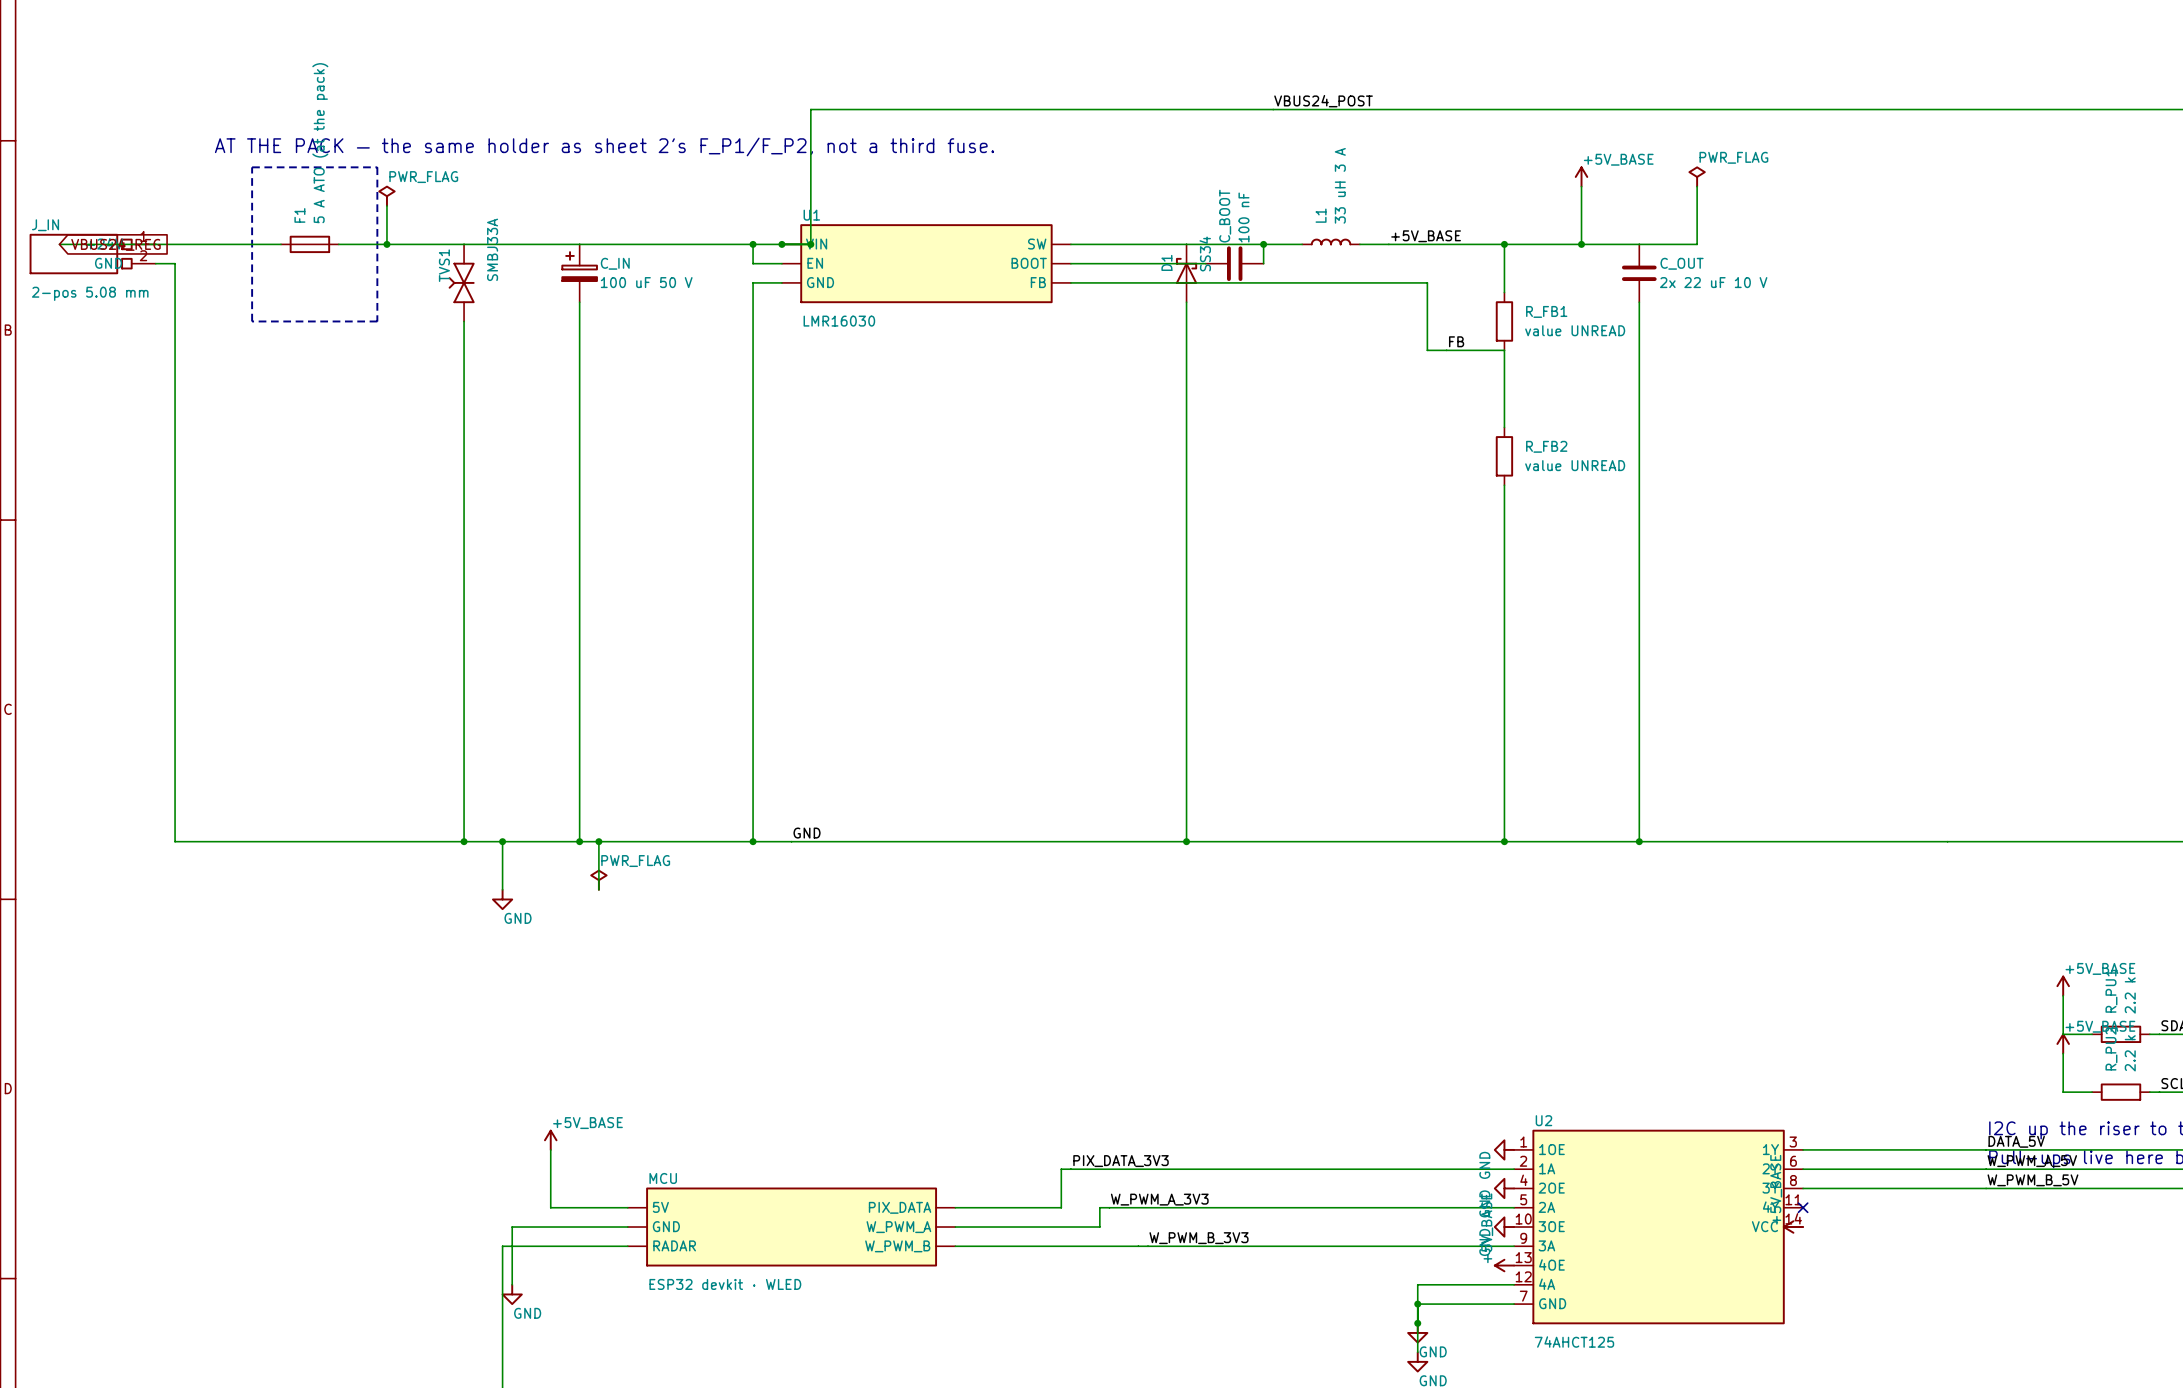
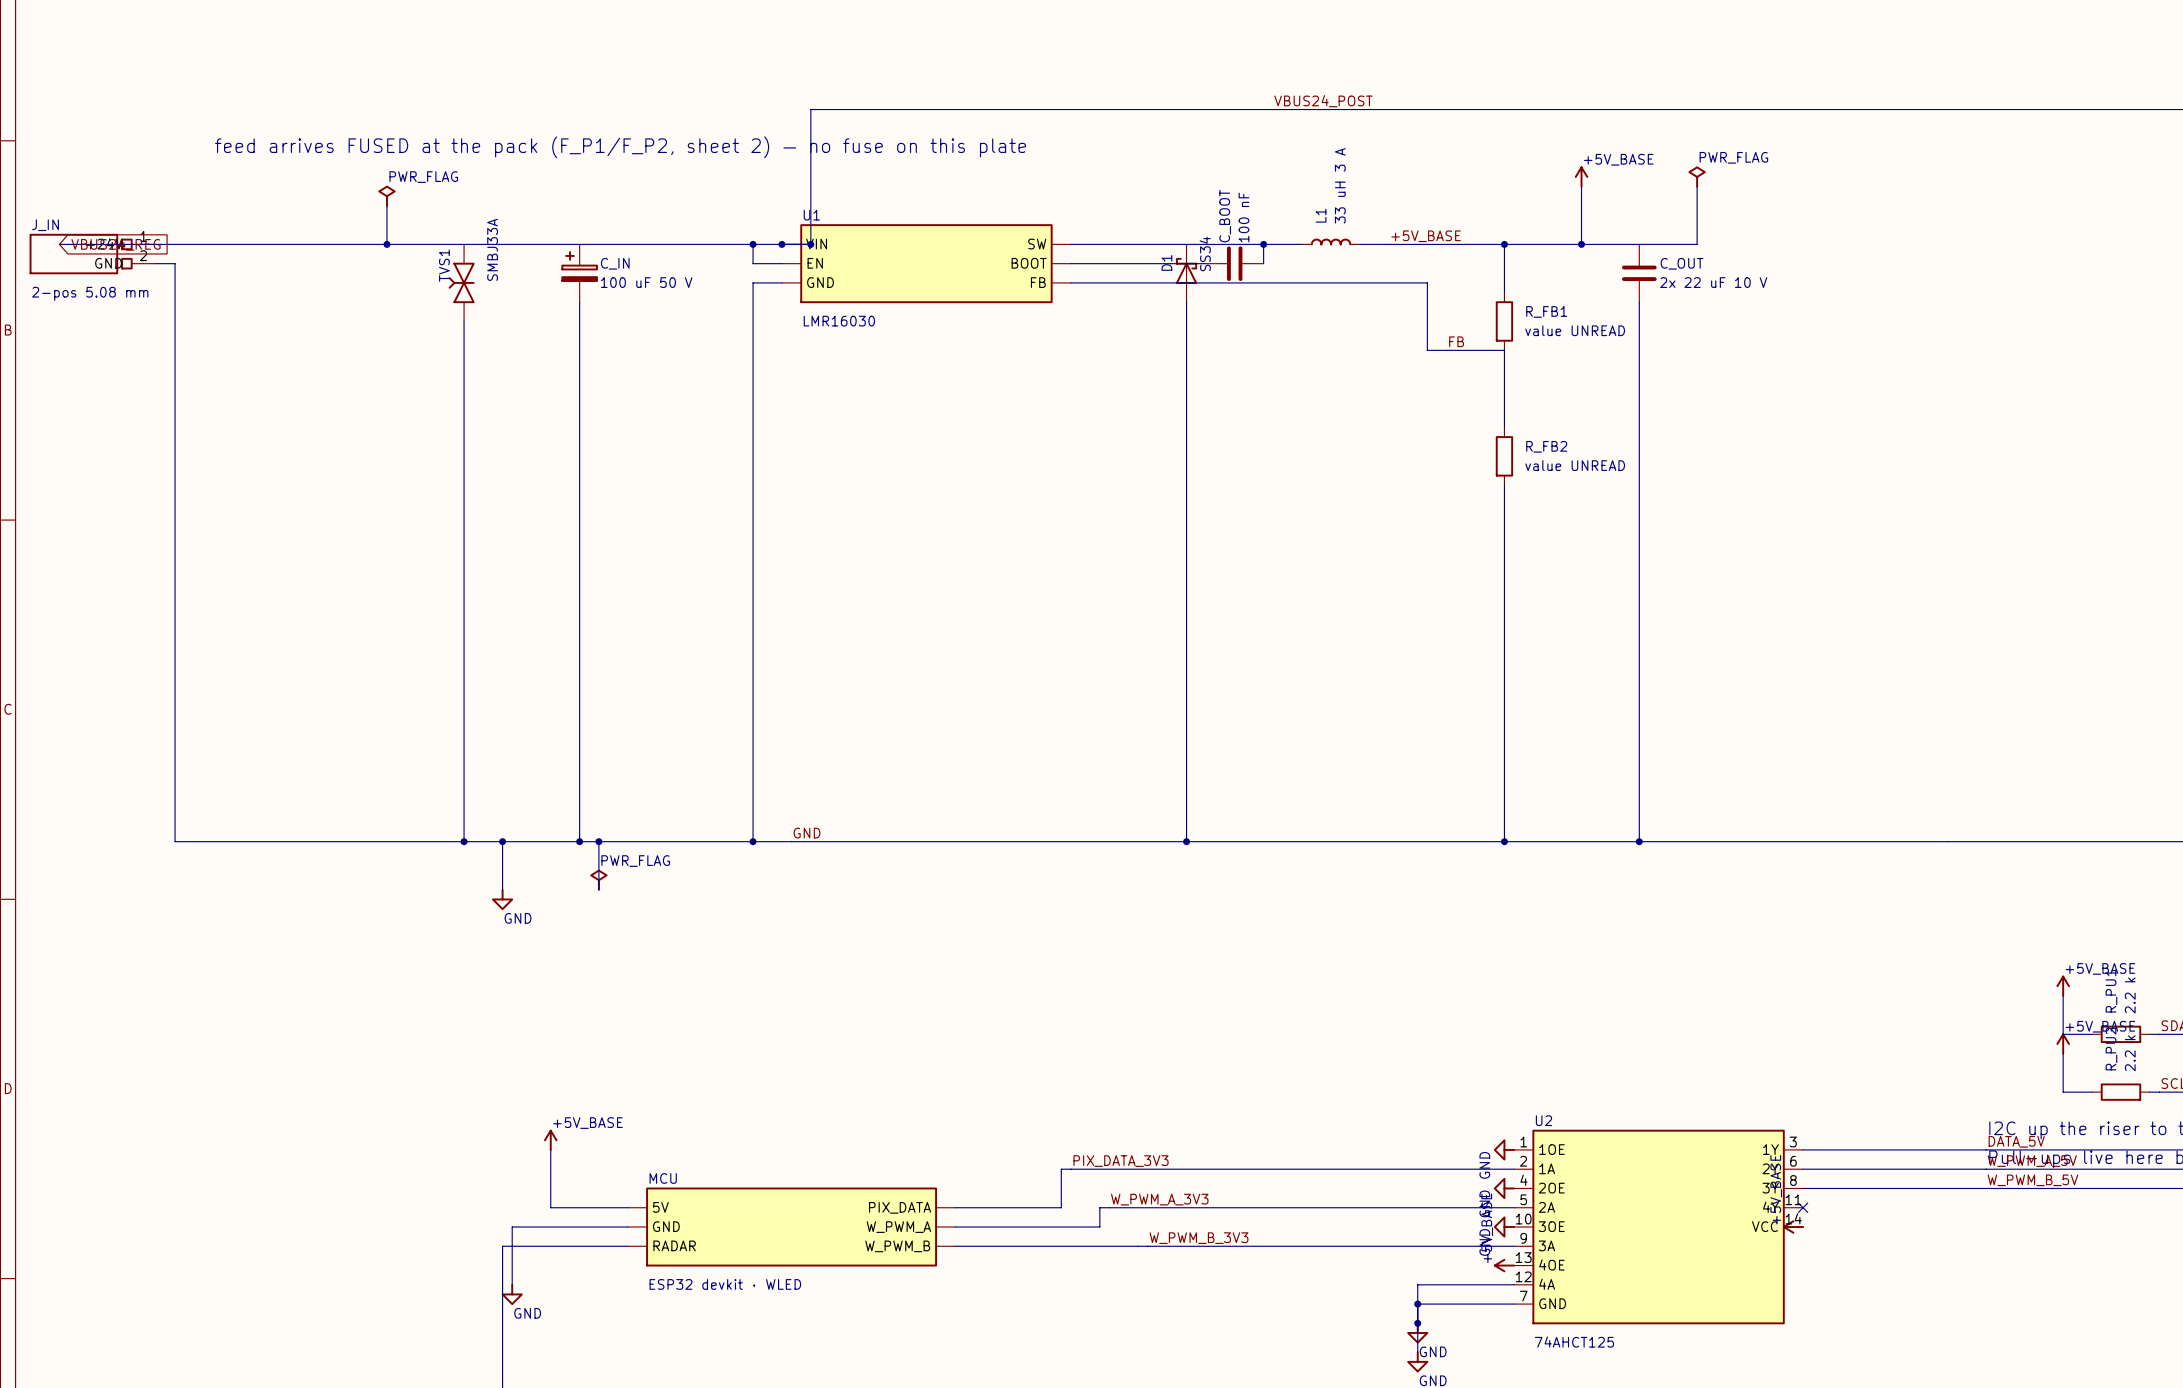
text: AT THE PACK — the same holder as sheet 2's F_P1/F_P2, not a third fuse. (604, 146) -> feed arrives FUSED at the pack (F_P1/F_P2, sheet 2) — no fuse on this plate (620, 147)
line: (252, 167) (377, 167) (377, 321) (252, 321) (252, 167) -> none
F1: 5 A ATO (at the pack) (309, 244) -> none

